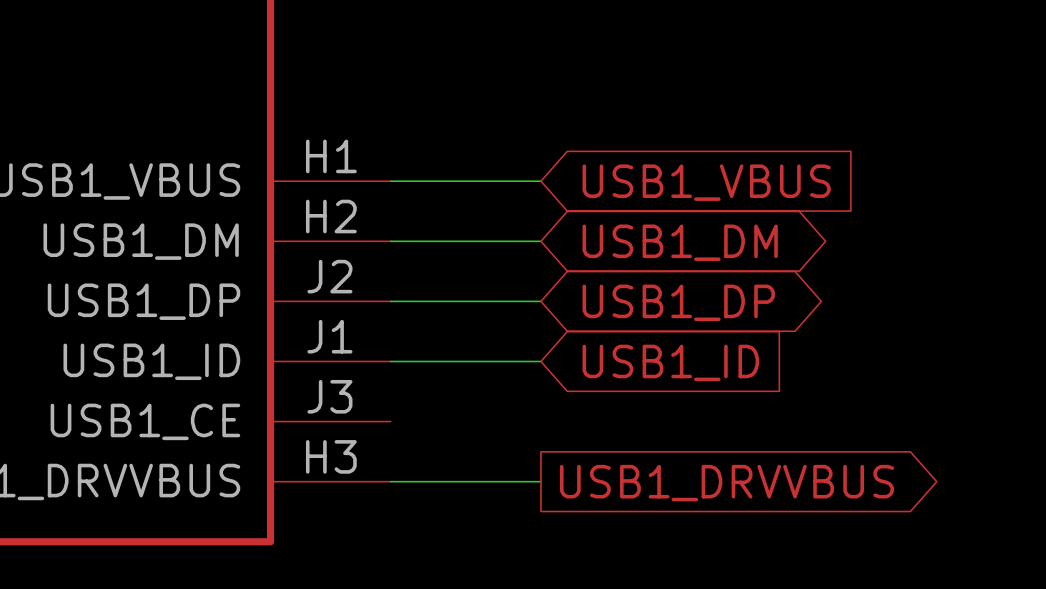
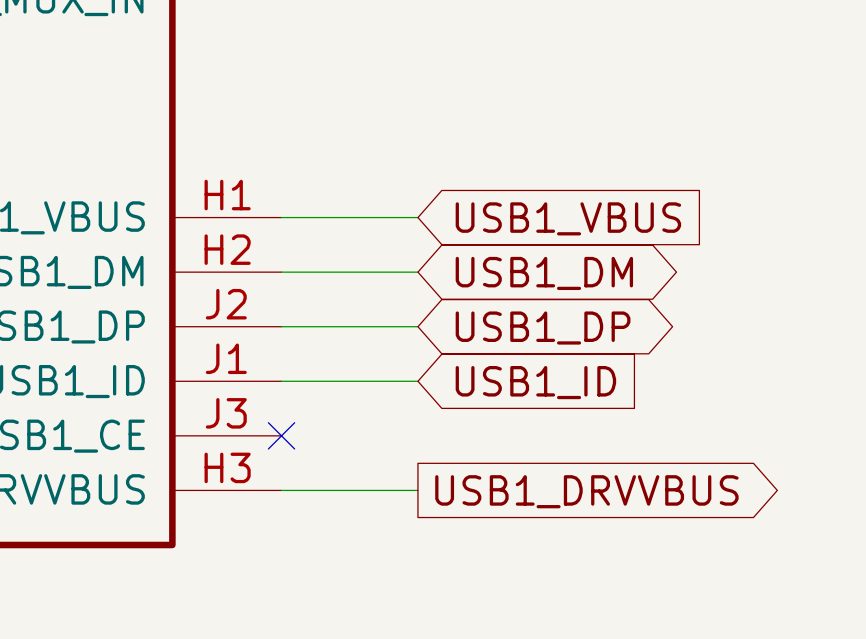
no-connect mark: none -> (281, 435)

